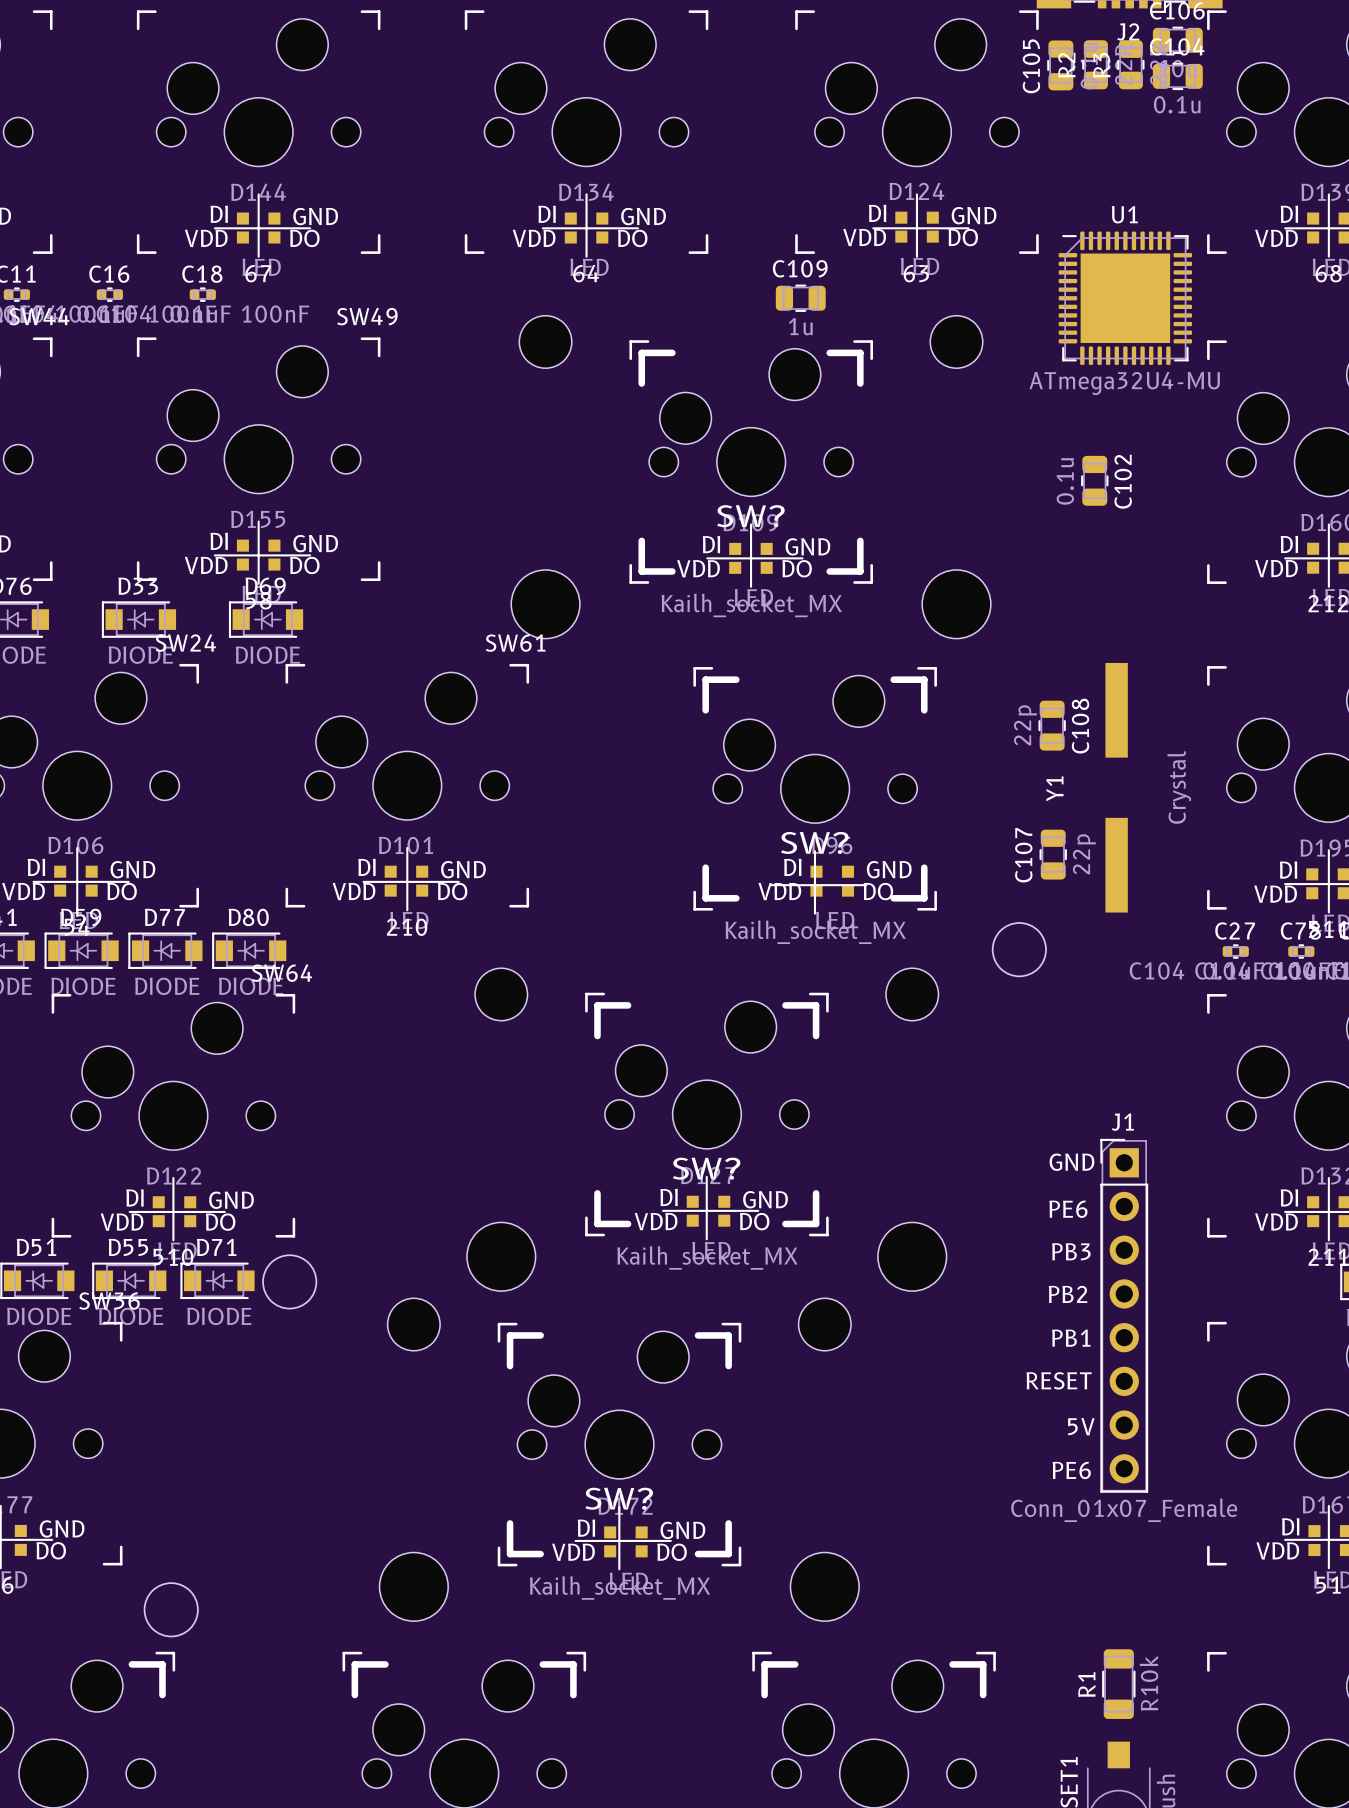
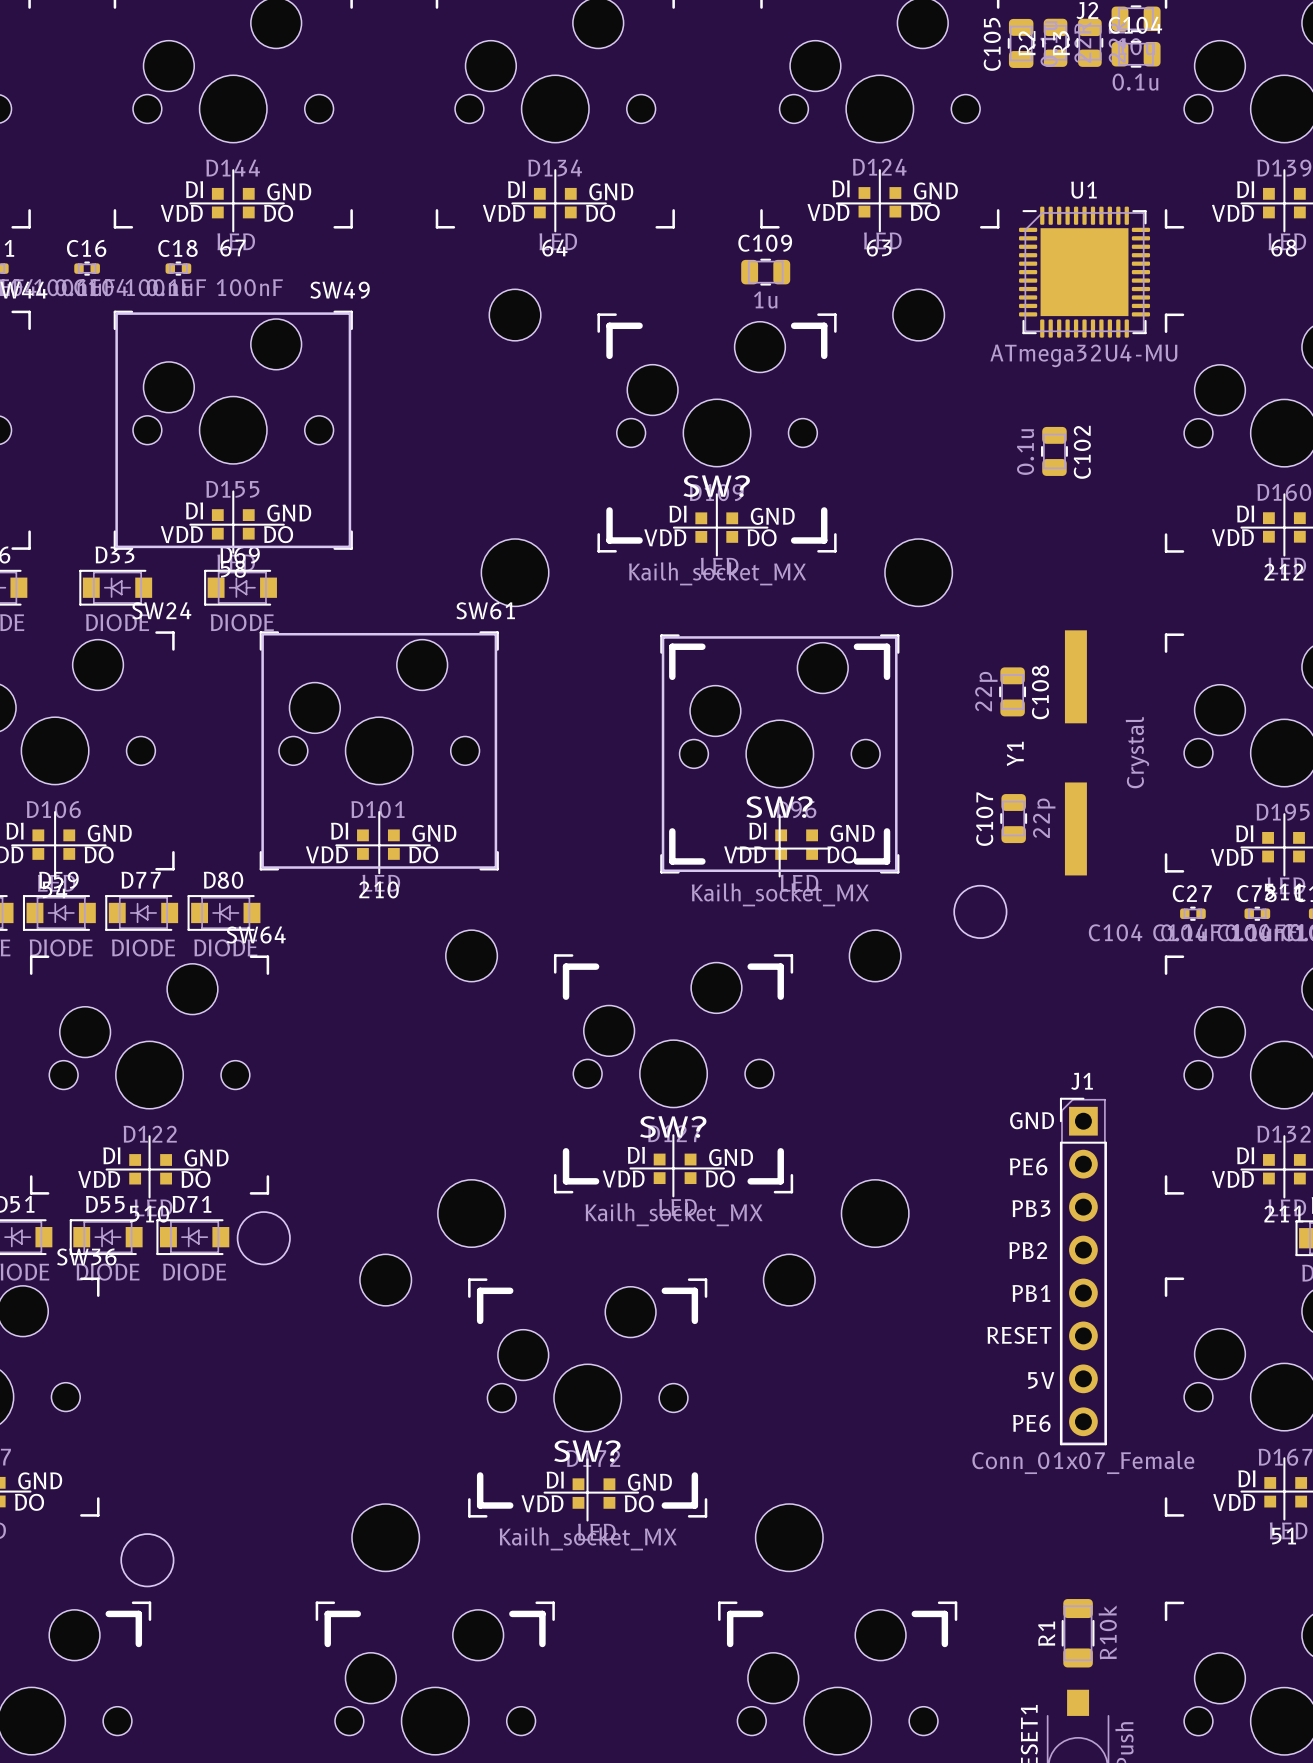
SW49 footprint: [136, 337, 381, 585] -> [113, 310, 353, 554]
SW61 footprint: [285, 663, 530, 912] -> [259, 631, 499, 875]
part footprint: [693, 667, 937, 915] -> [660, 634, 900, 878]

